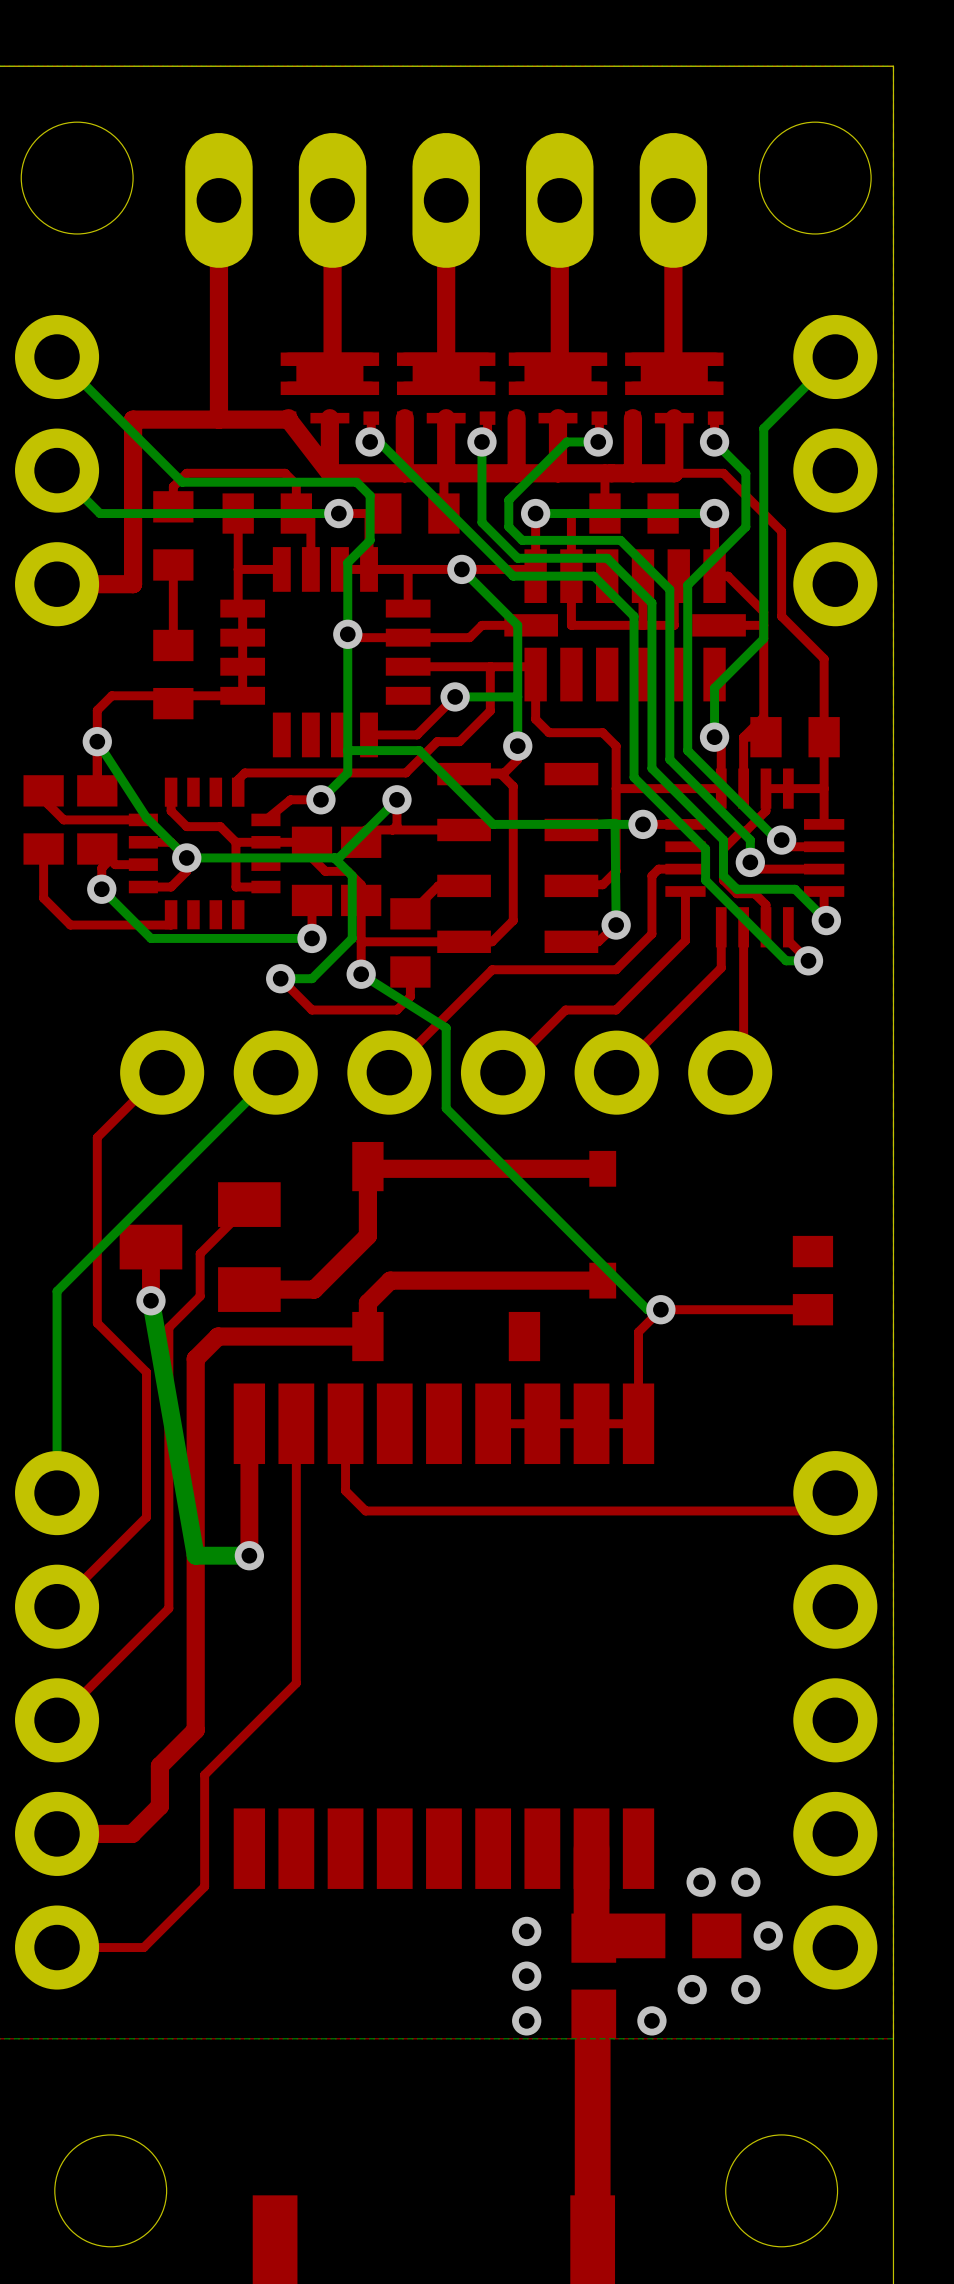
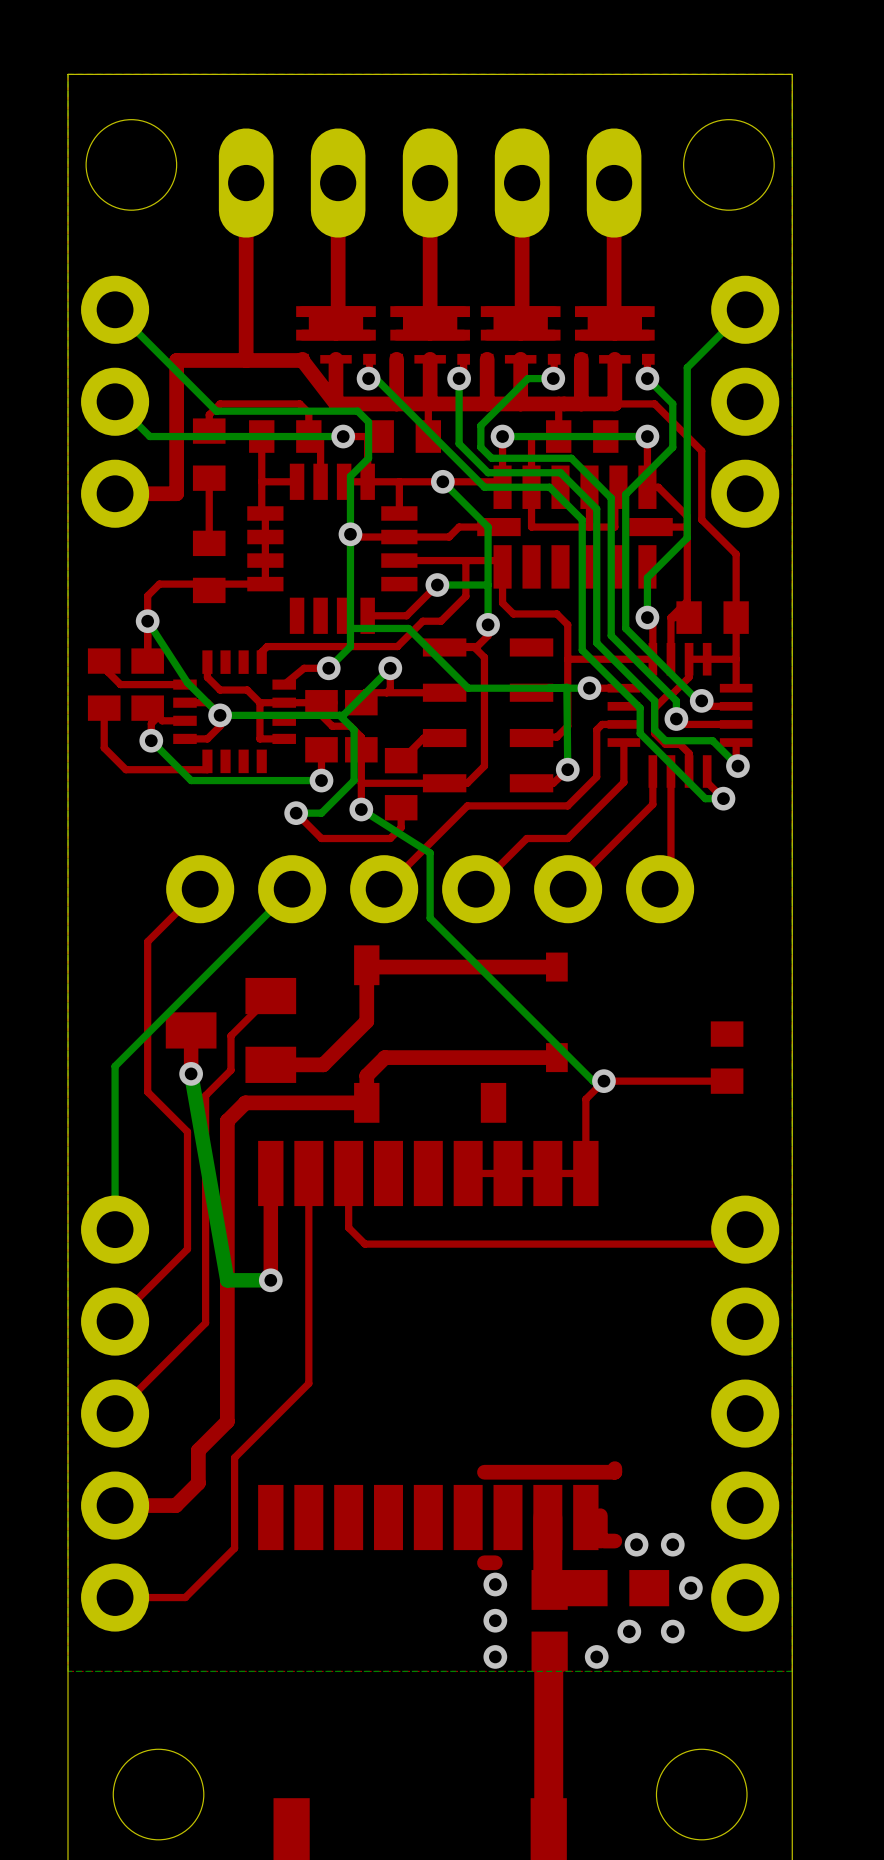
top track: none -> (614, 1468) (614, 1472) (484, 1472)
top track: none -> (600, 1515) (600, 1541)
top track: none -> (614, 1541) (603, 1541)
top track: none -> (495, 1562) (484, 1562)

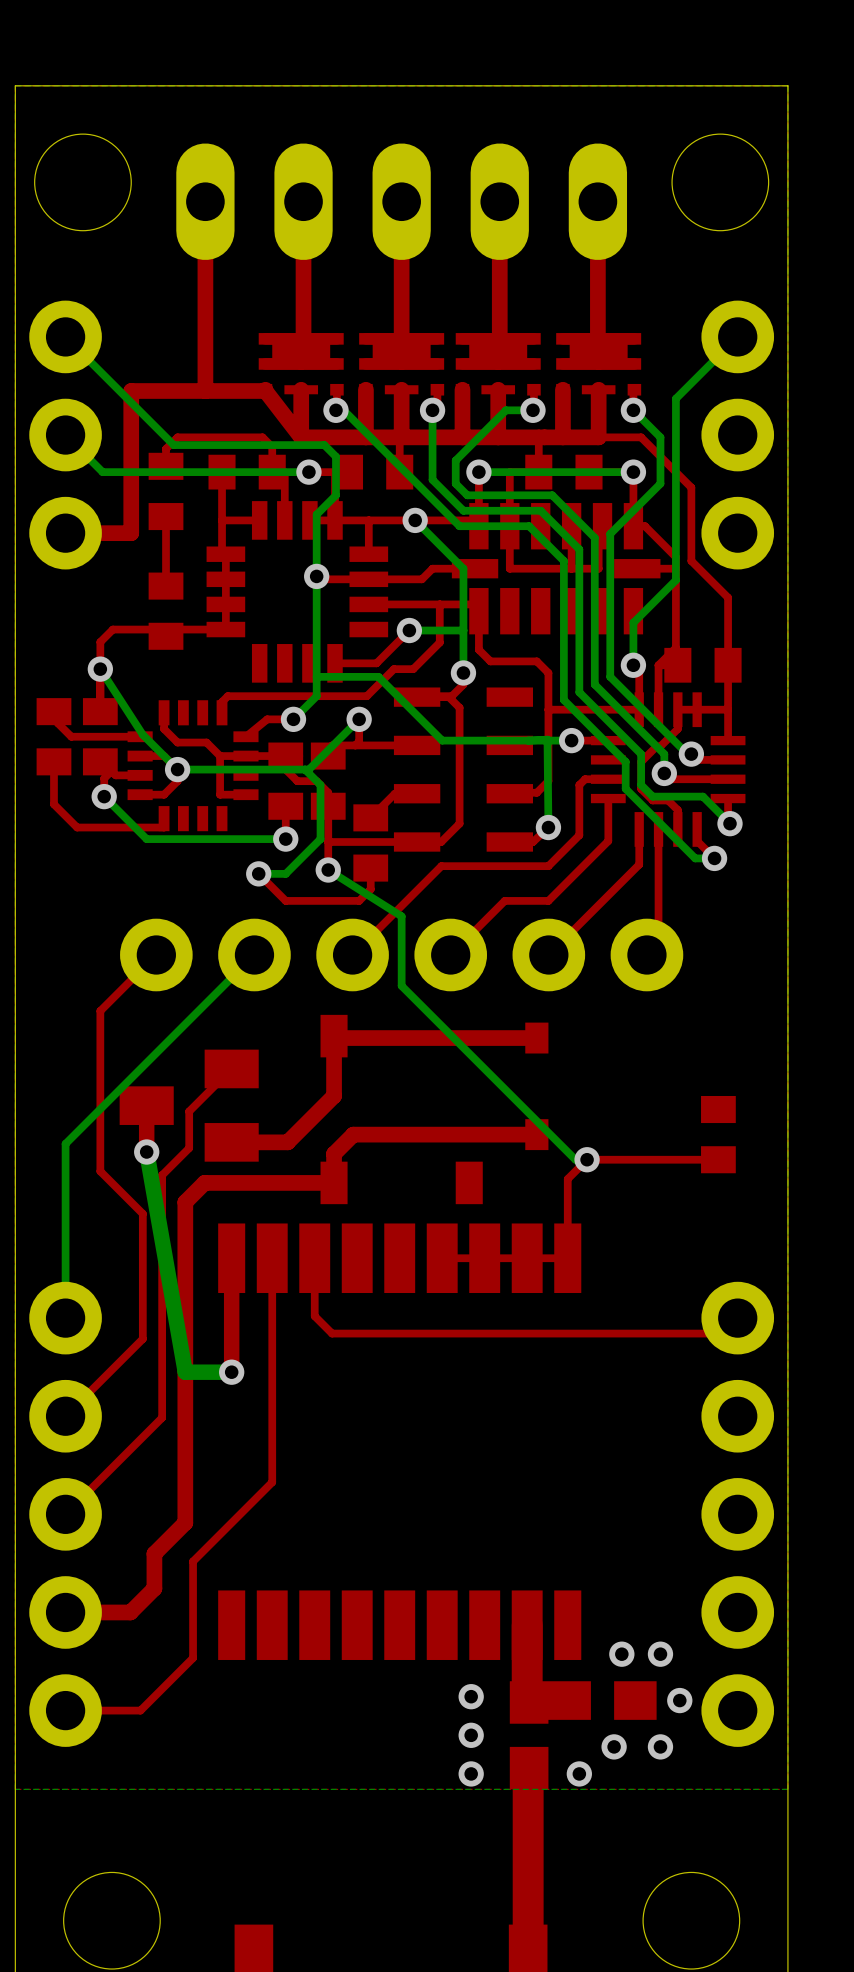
top track: (614, 1468) (614, 1472) (484, 1472) -> none
top track: (600, 1515) (600, 1541) -> none
top track: (614, 1541) (603, 1541) -> none
top track: (495, 1562) (484, 1562) -> none

